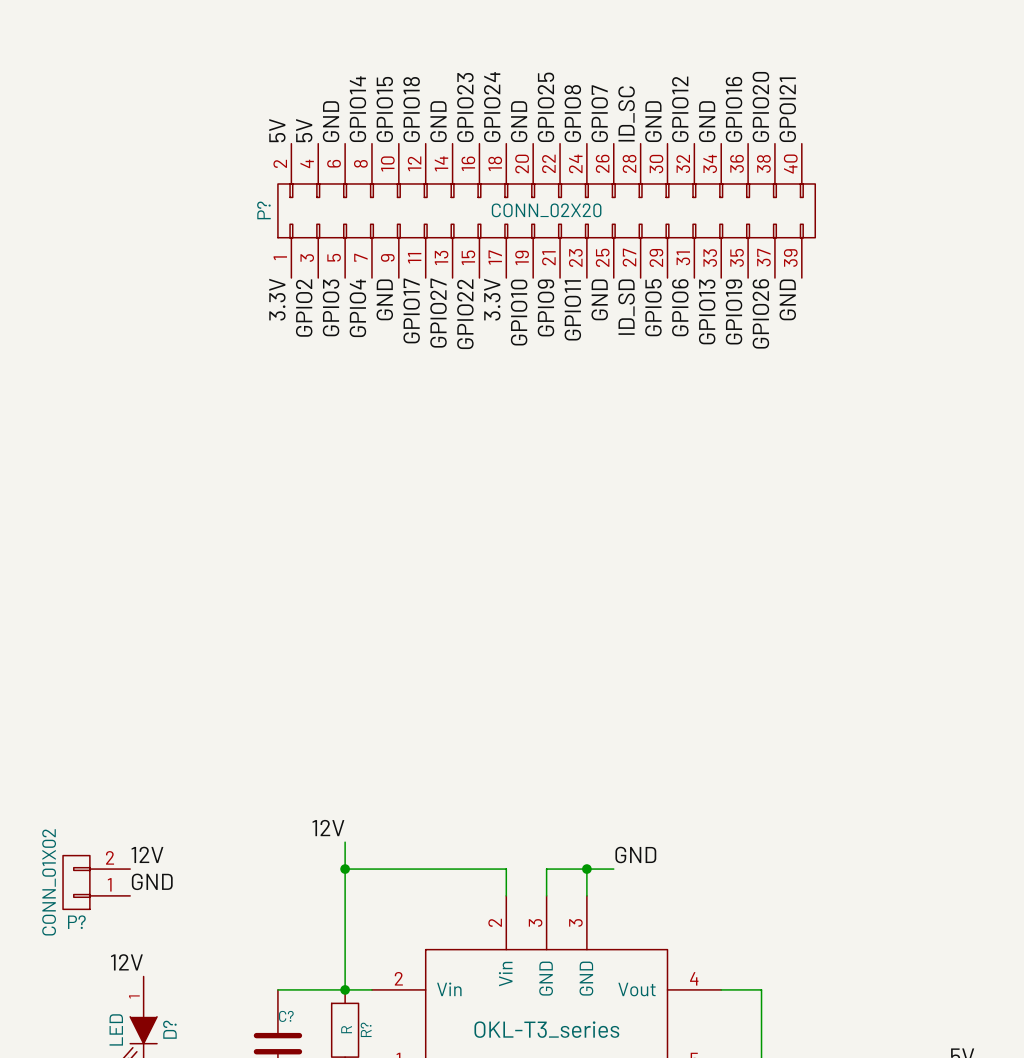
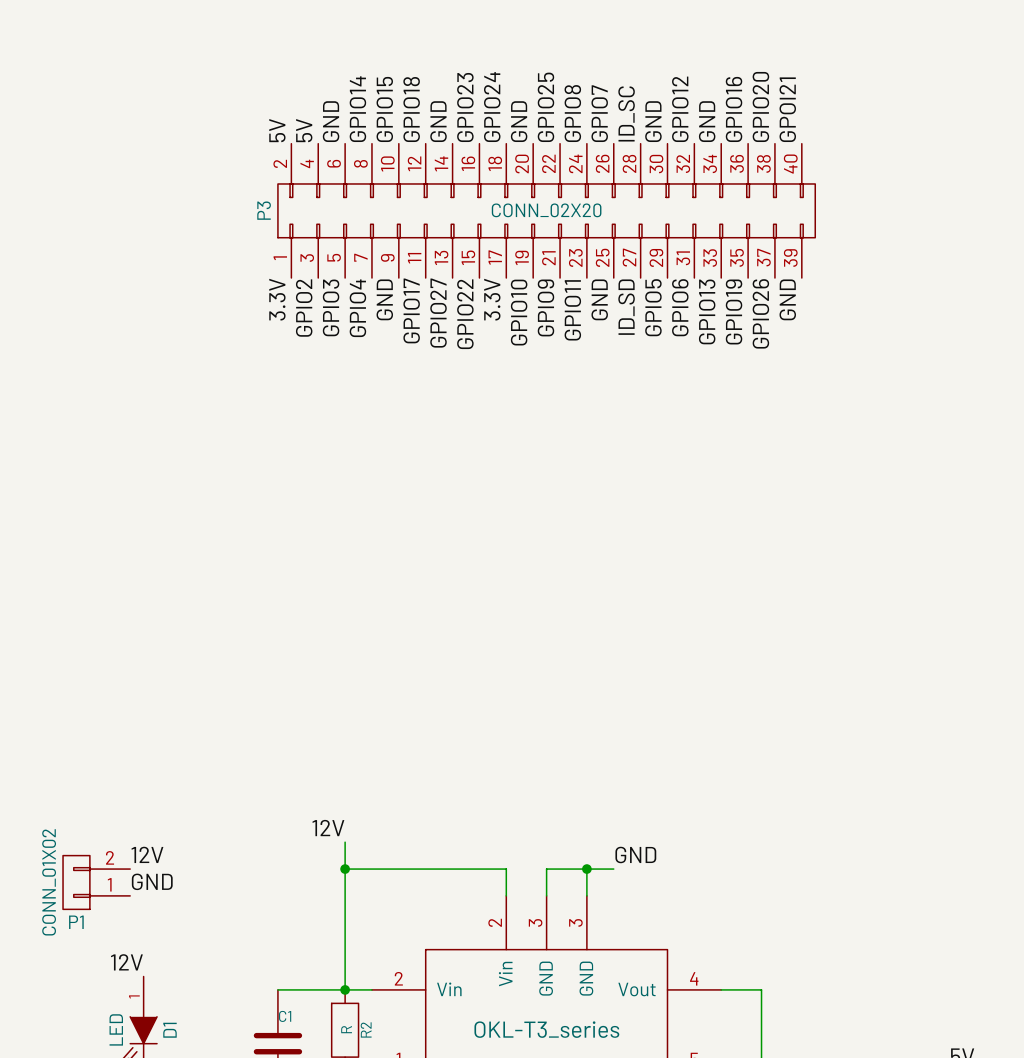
P? name: P? (263, 210) -> P3 (264, 210)
P? name: P? (76, 922) -> P1 (76, 922)
C? name: C? (286, 1016) -> C1 (285, 1016)
D? name: D? (169, 1029) -> D1 (169, 1030)
R? name: R? (366, 1029) -> R2 (366, 1029)

